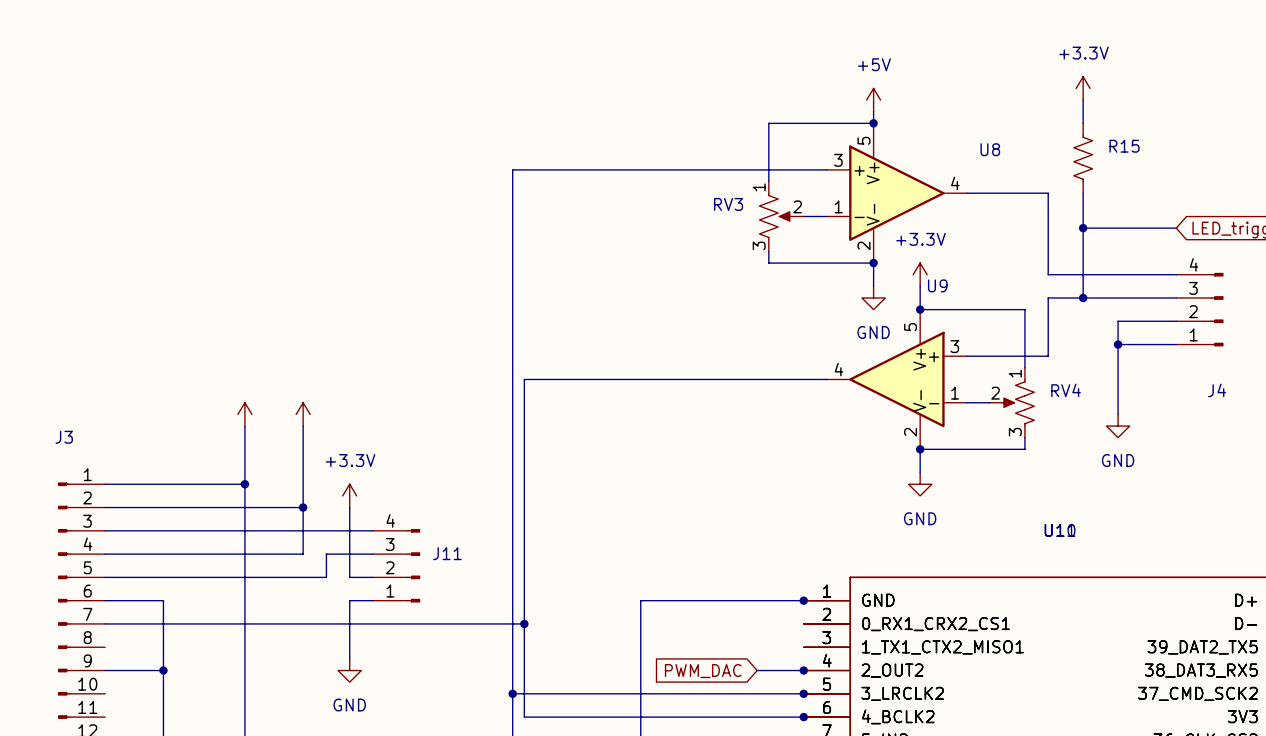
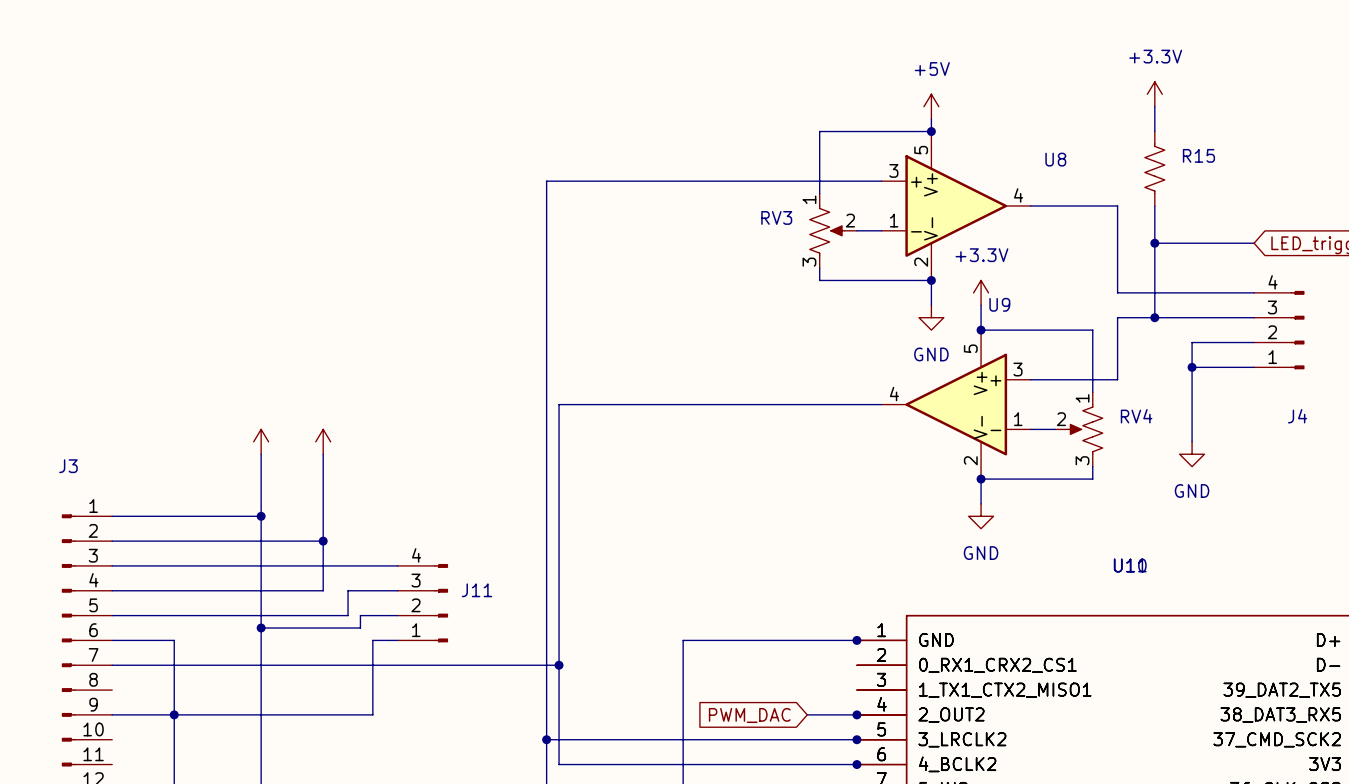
power symbol: +3.3V (349, 495) -> none
wire: (349, 507) (349, 577) -> (261, 628) (360, 628) (360, 615) (372, 615)
junction: none -> (261, 628)
wire: none -> (372, 702) (372, 714) (174, 714)
power symbol: GND (349, 670) -> none

